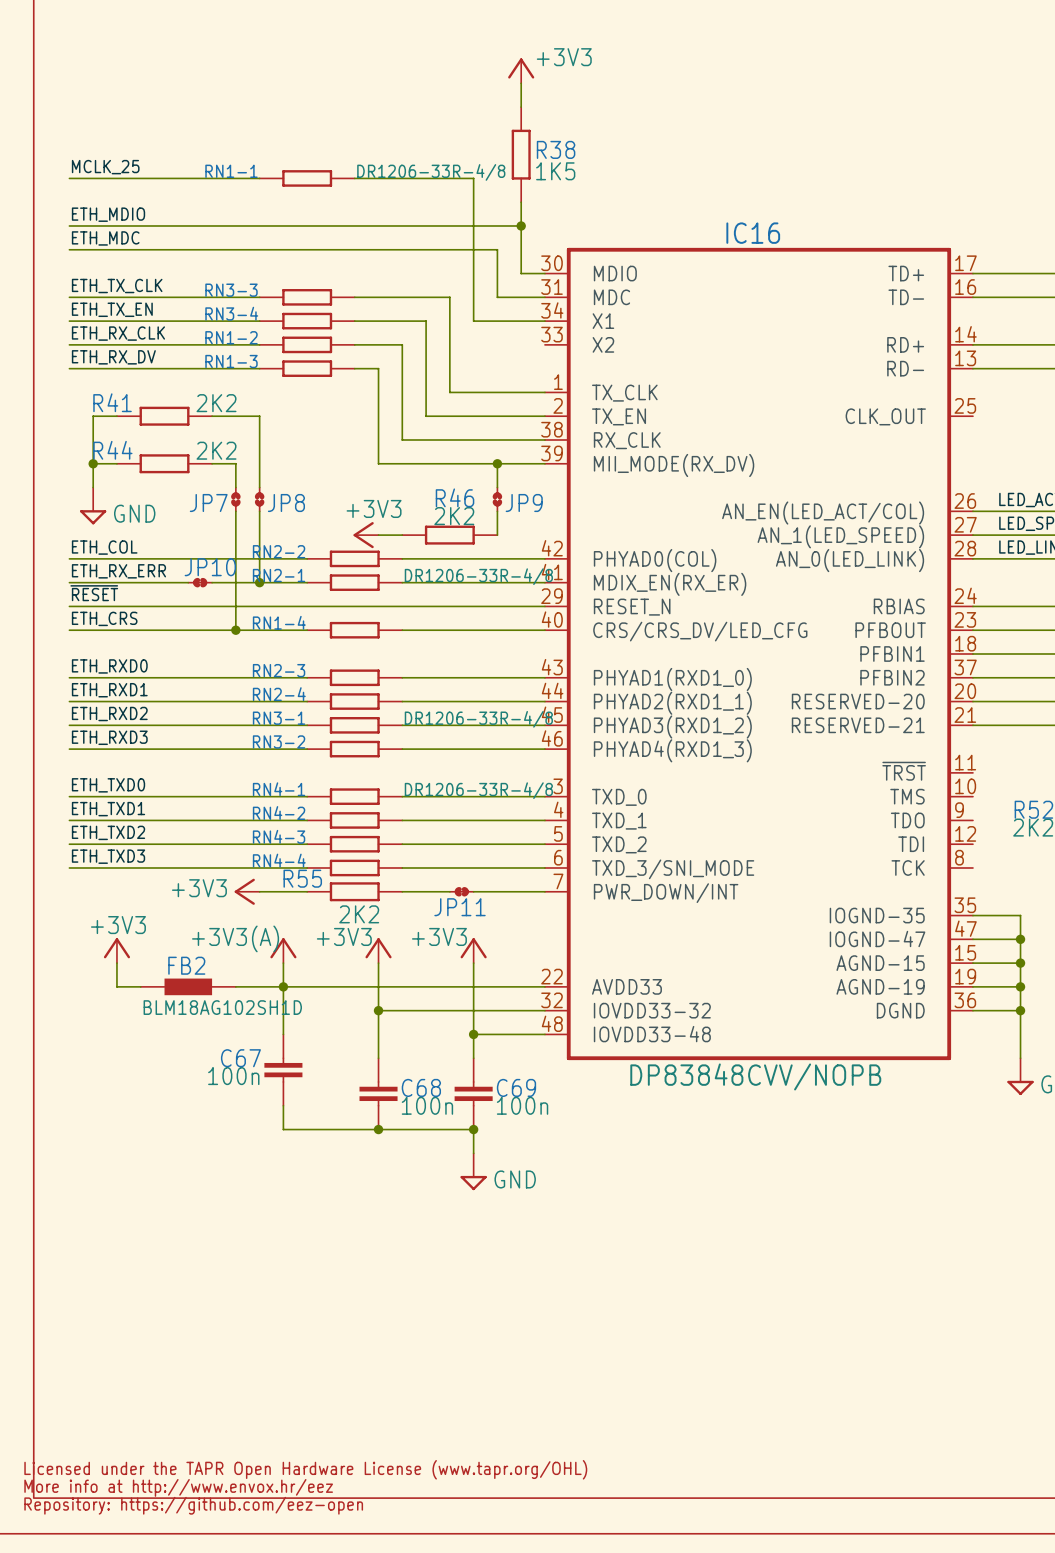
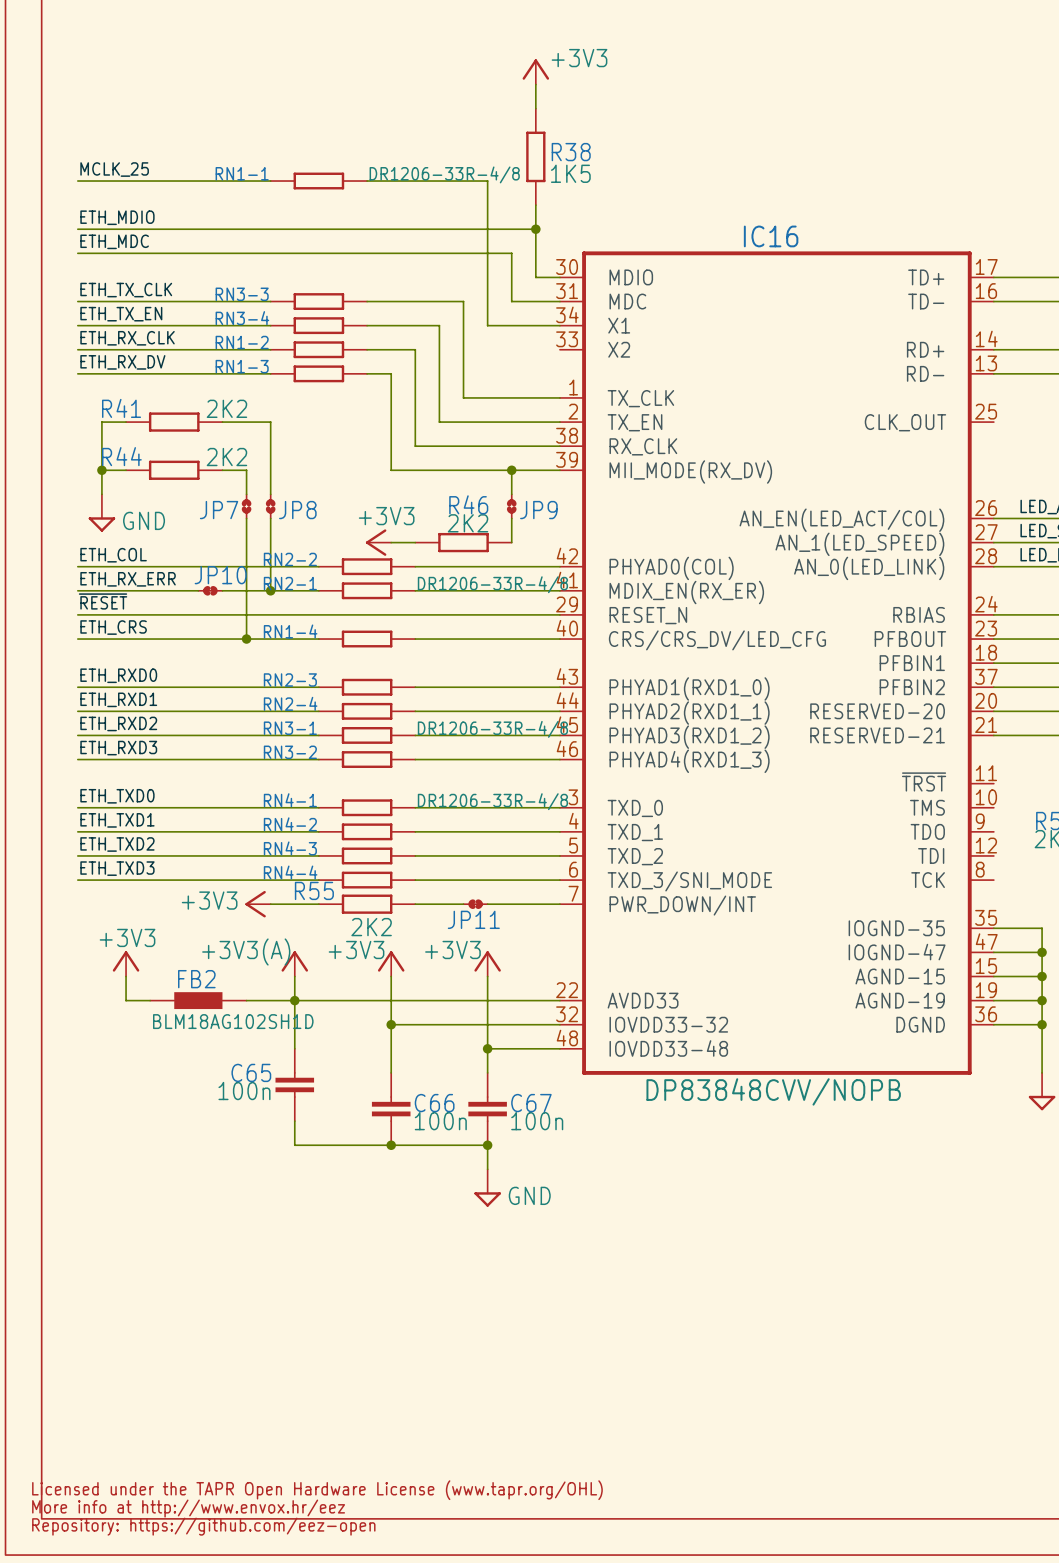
C67 name: C67 (240, 1058) -> C65 (251, 1072)
C68 name: C68 (421, 1087) -> C66 (434, 1103)
C69 name: C69 (516, 1087) -> C67 (531, 1103)

